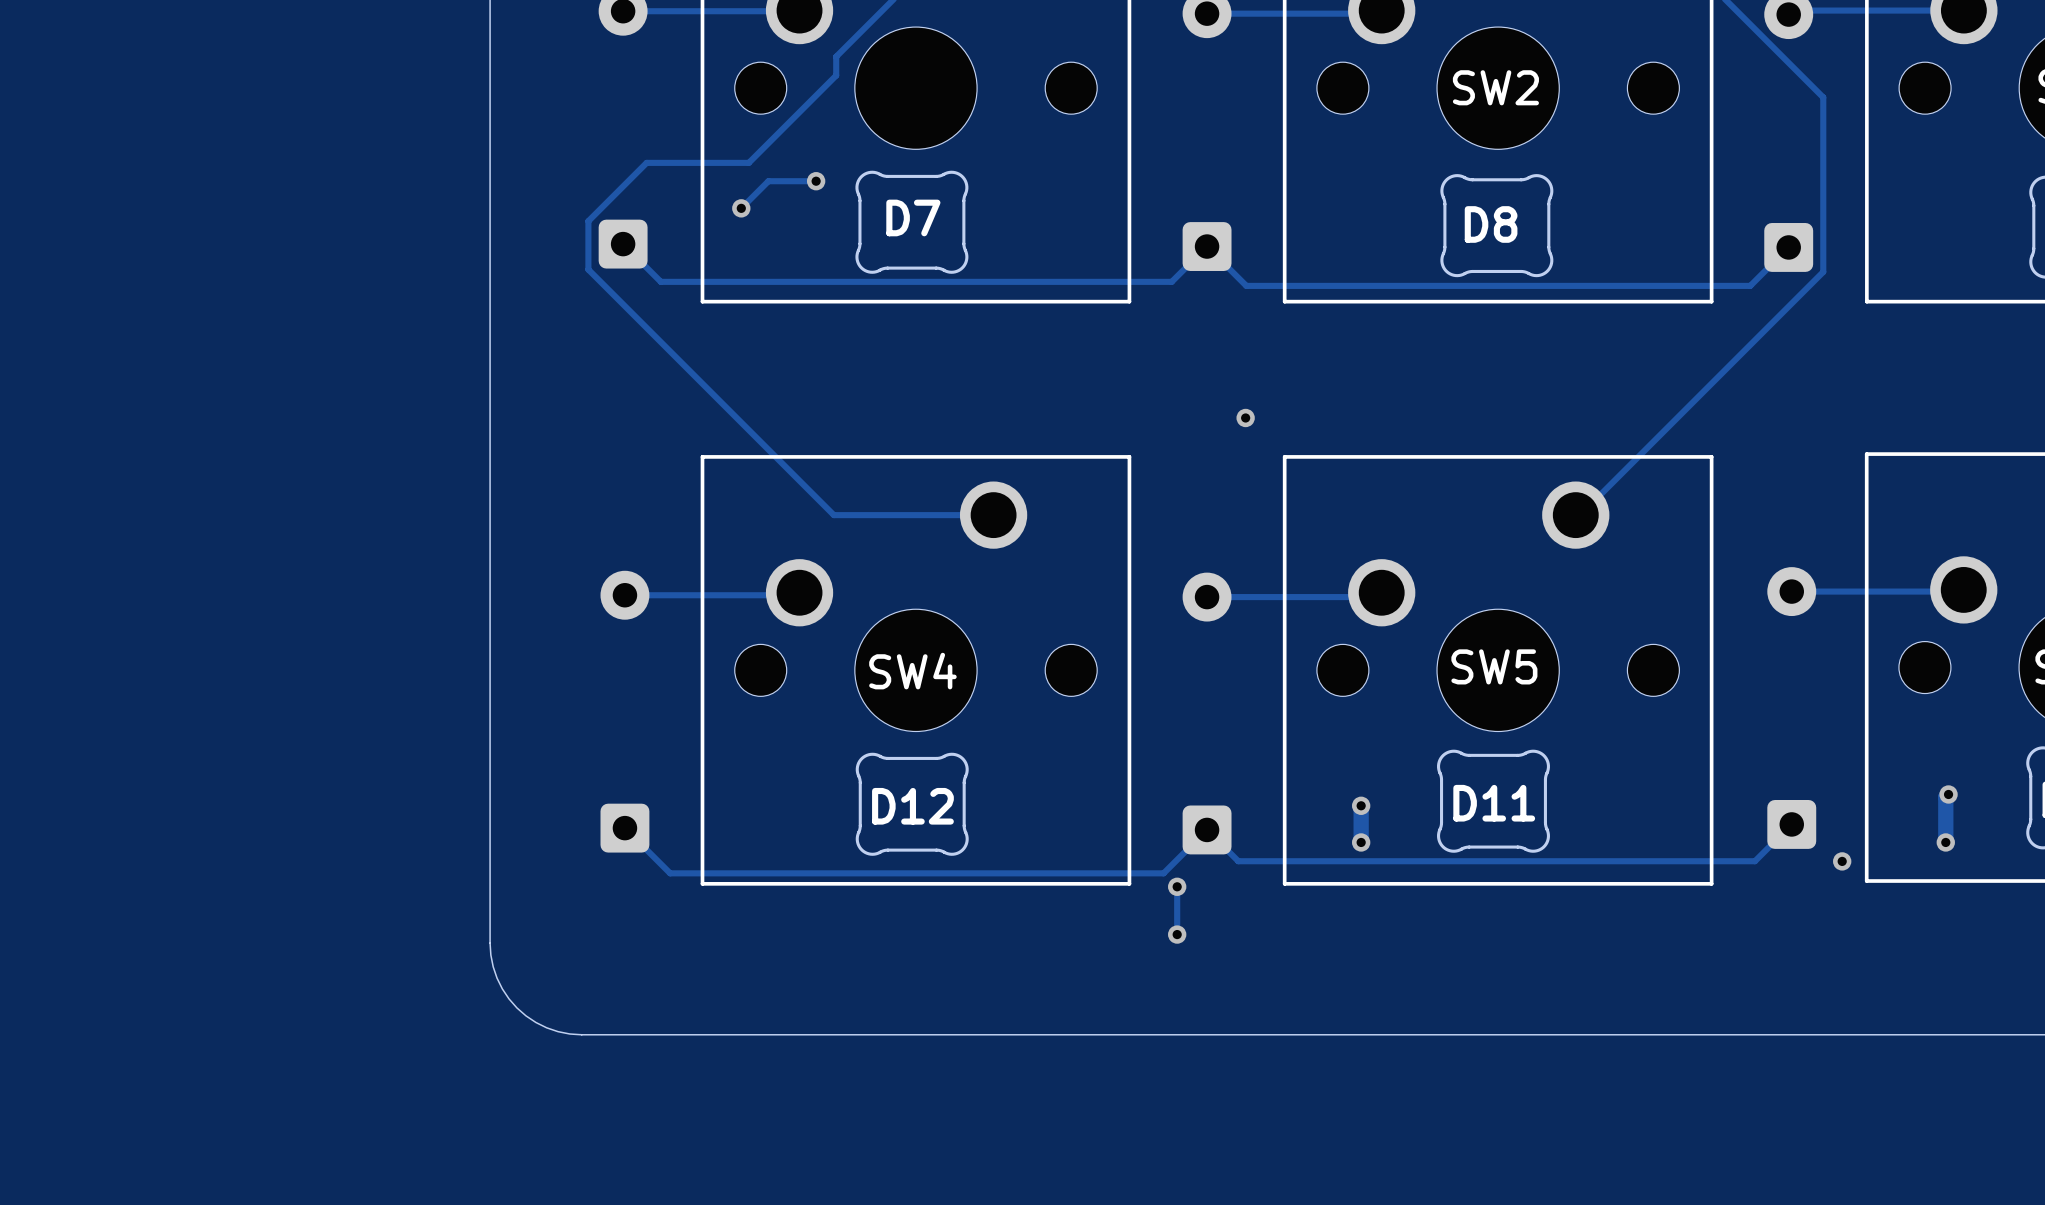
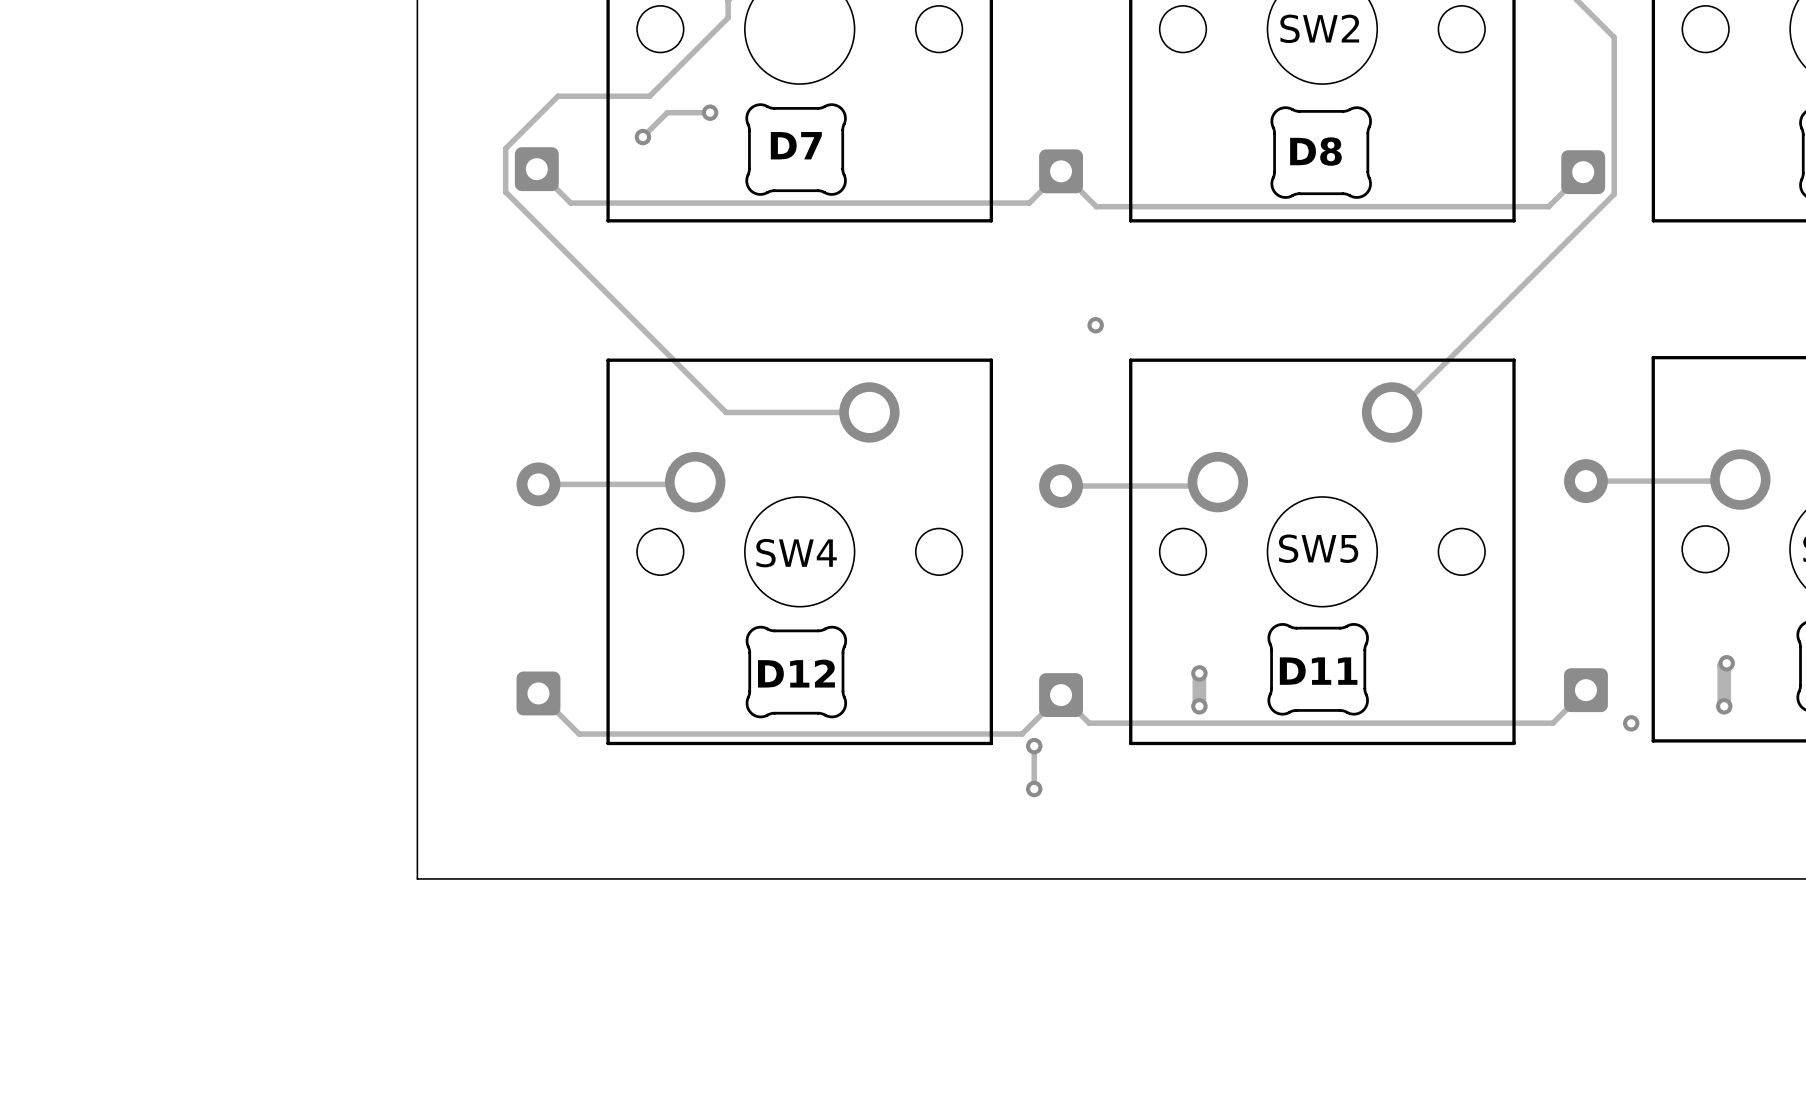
board edge: (490, 943) (490, 955) (497, 978) (509, 998) (516, 1007) (525, 1015) (546, 1027) (558, 1031) (581, 1034) -> (417, 796) (417, 878) (499, 878)

